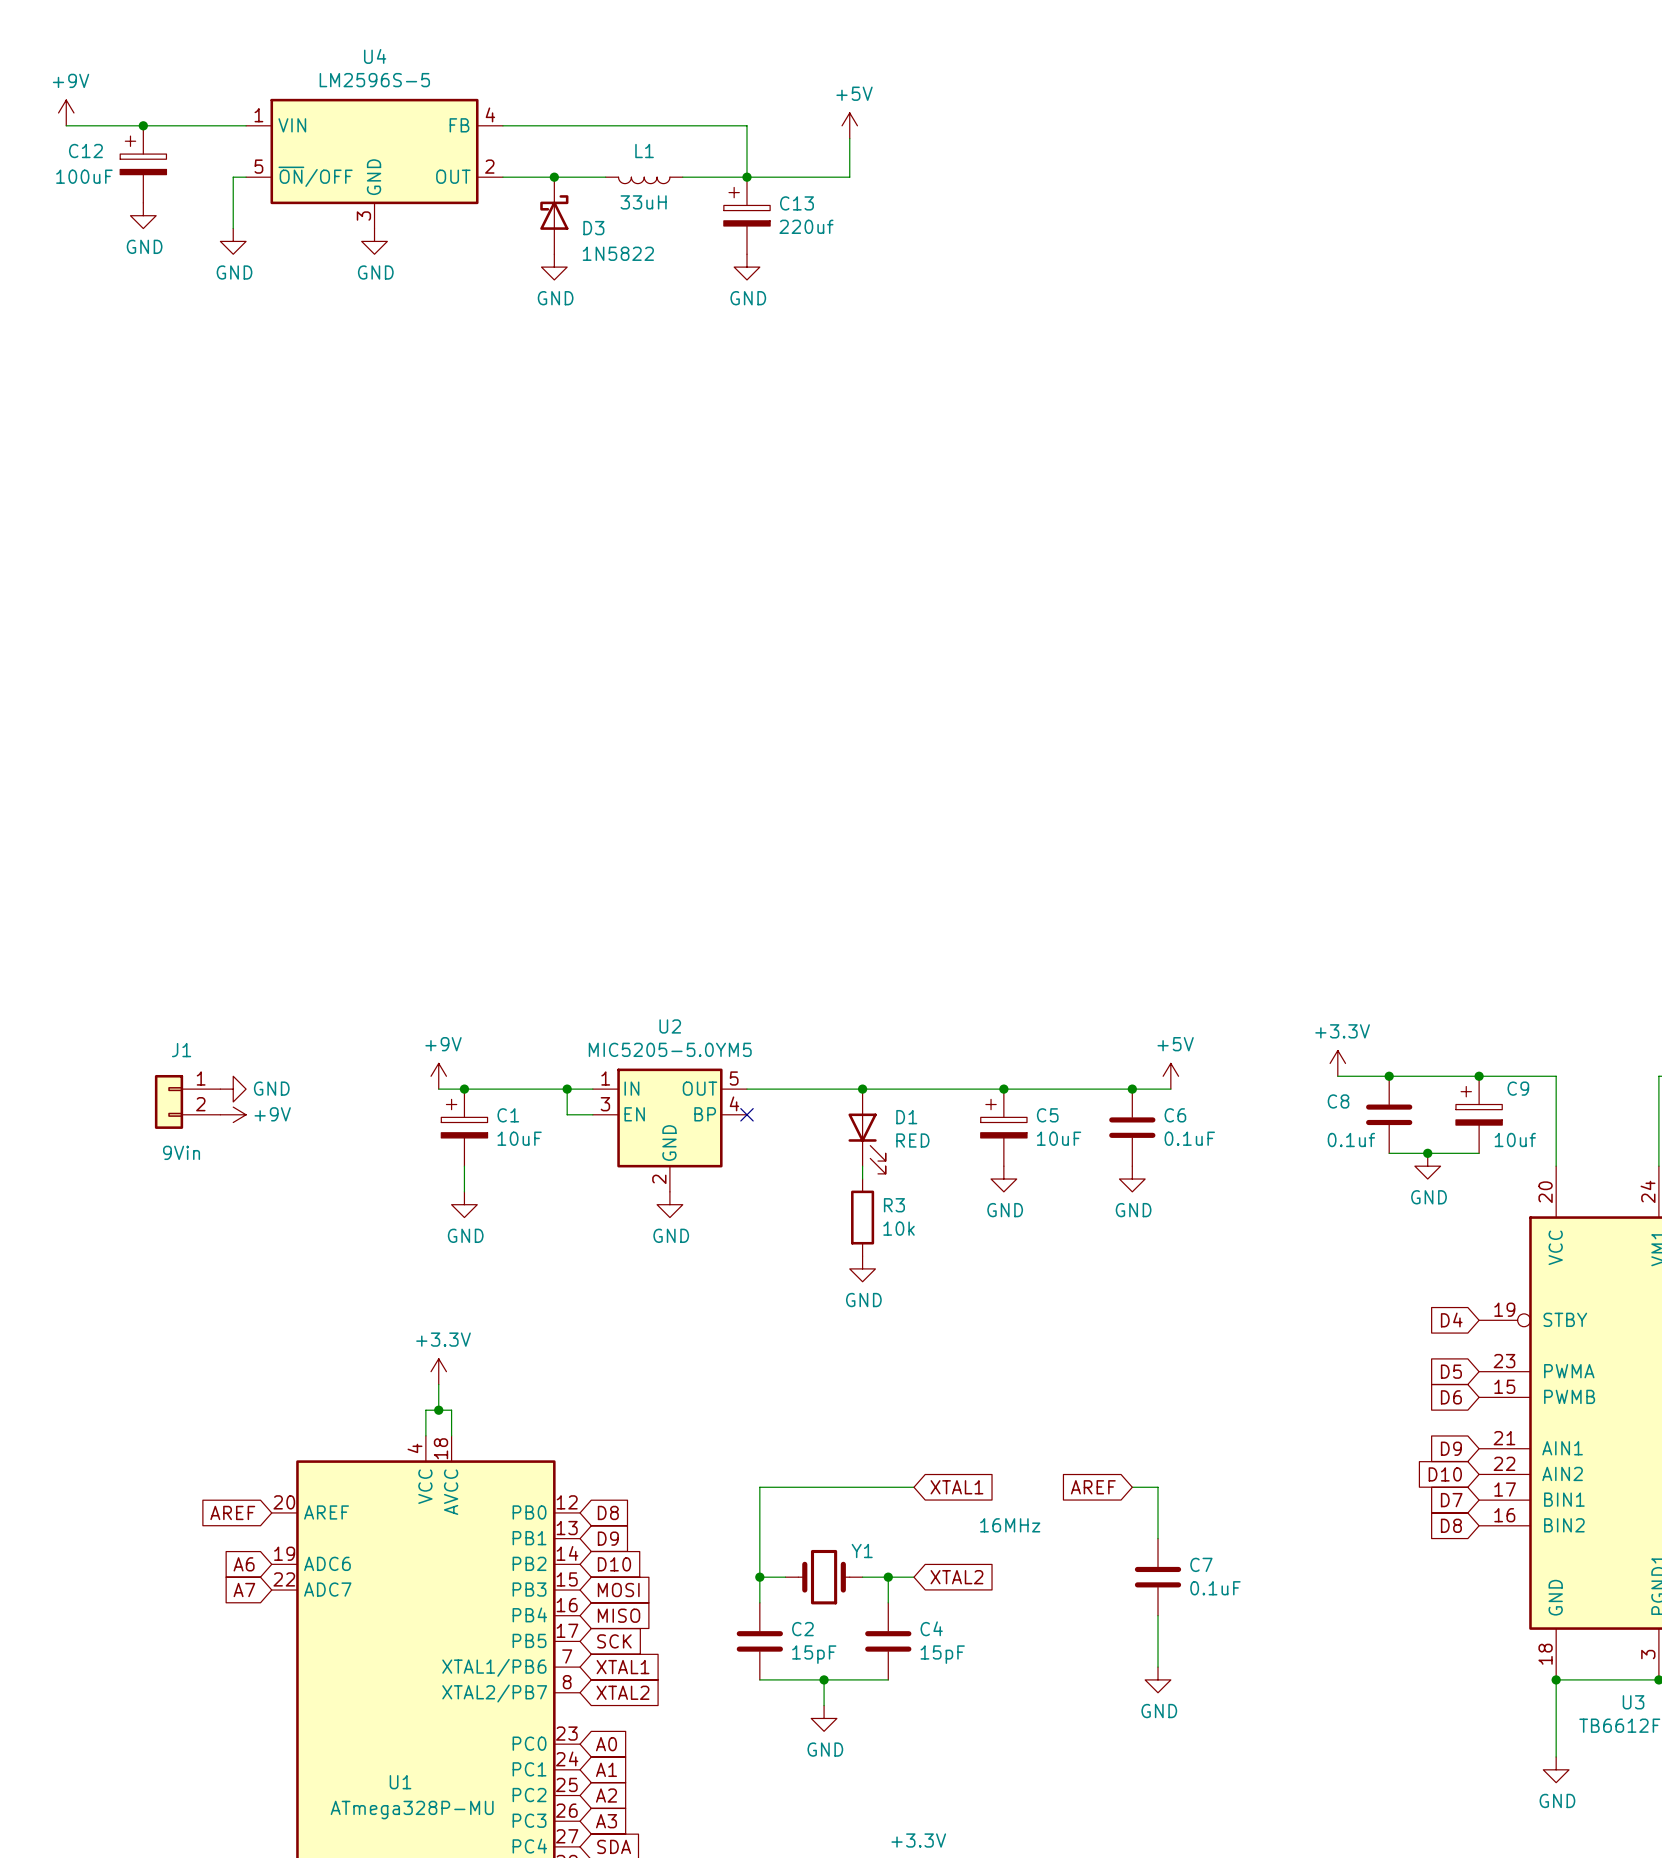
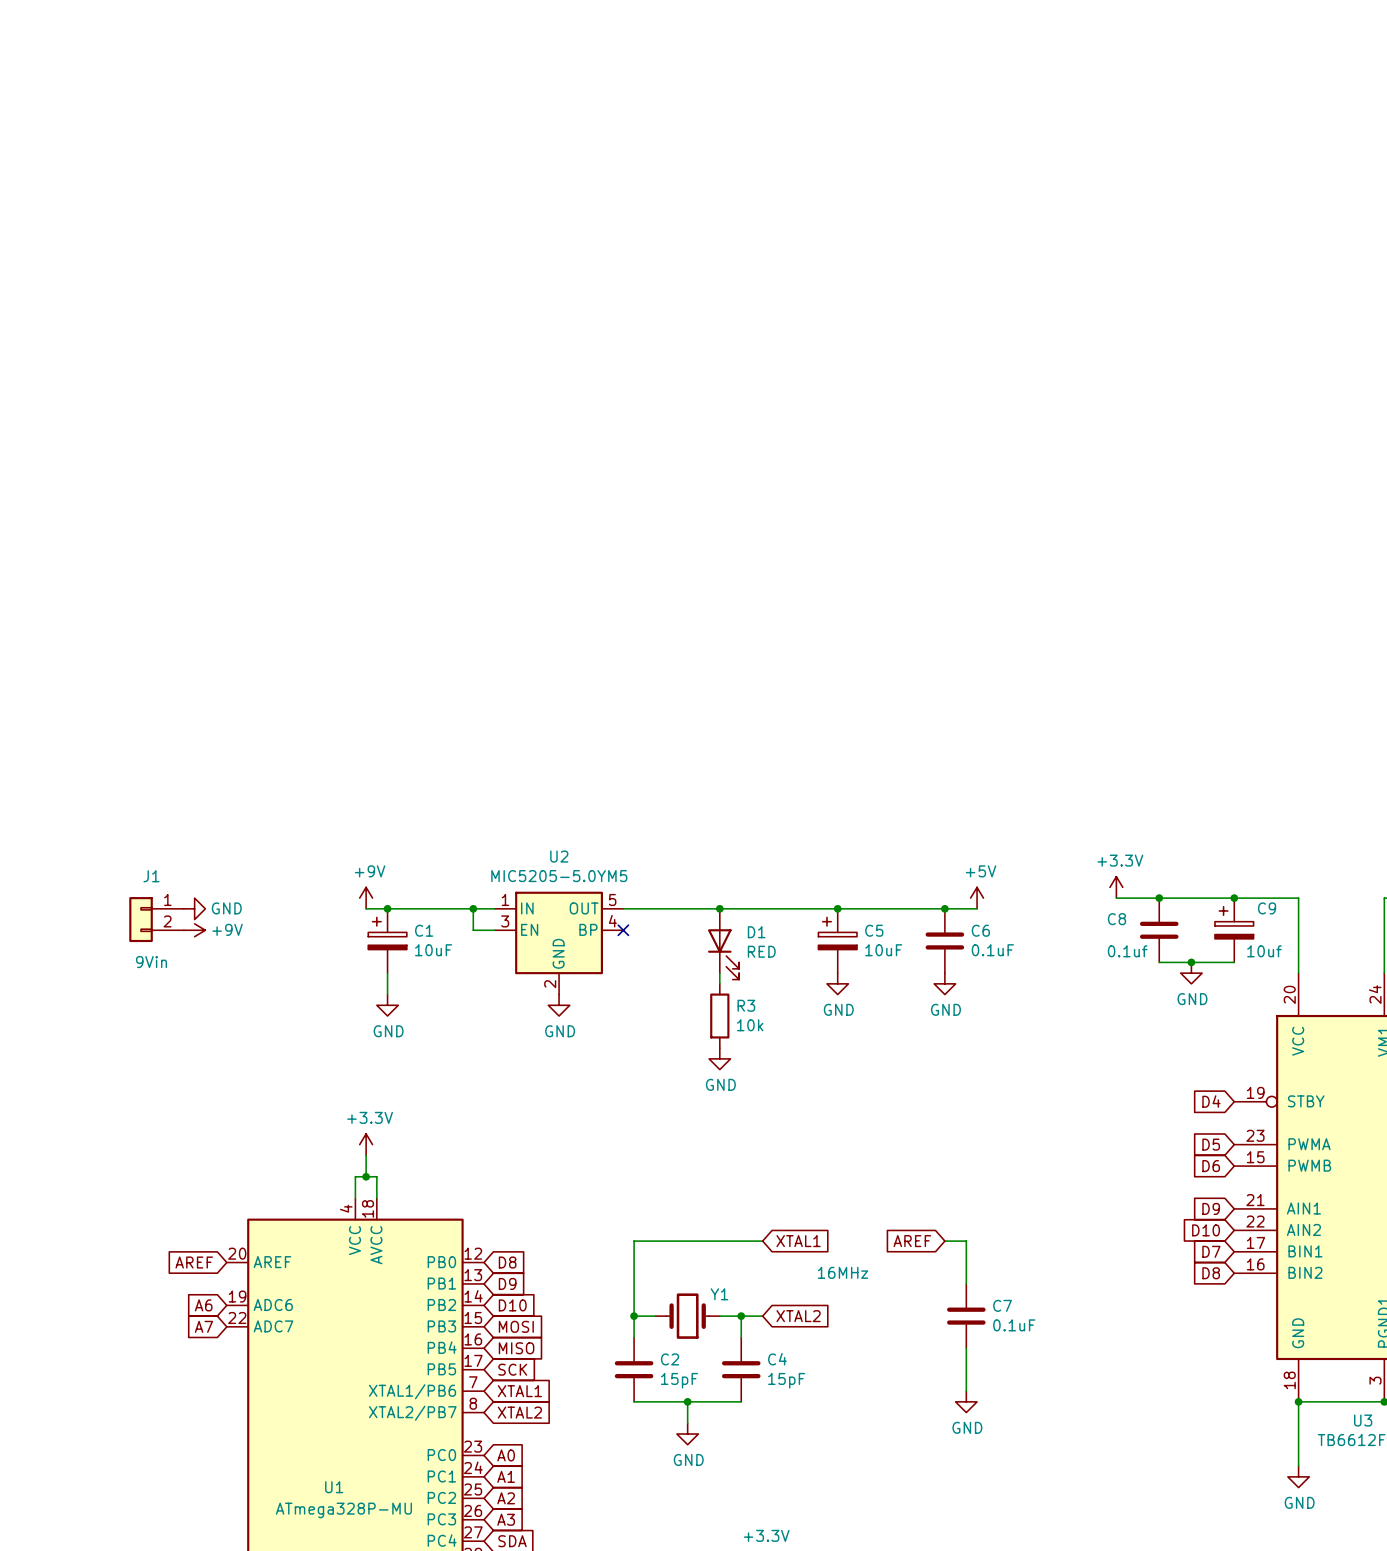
power symbol: +9V (66, 112) -> none
wire: (66, 125) (246, 125) -> none
junction: (143, 125) -> none
wire: (502, 125) (746, 125) (746, 177) -> none
power symbol: +5V (849, 125) -> none
wire: (849, 138) (849, 177) (682, 177) -> none
U4: LM2596S-5 (374, 163) -> none
C12: 100uF (143, 164) -> none
wire: (246, 177) (233, 177) (233, 228) -> none
wire: (502, 177) (605, 177) -> none
junction: (554, 177) -> none
junction: (746, 177) -> none
L1: 33uH (644, 180) -> none
power symbol: GND (143, 215) -> none
D3: 1N5822 (554, 215) -> none
C13: 220uf (746, 215) -> none
power symbol: GND (233, 241) -> none
power symbol: GND (374, 241) -> none
power symbol: GND (554, 267) -> none
power symbol: GND (746, 267) -> none

